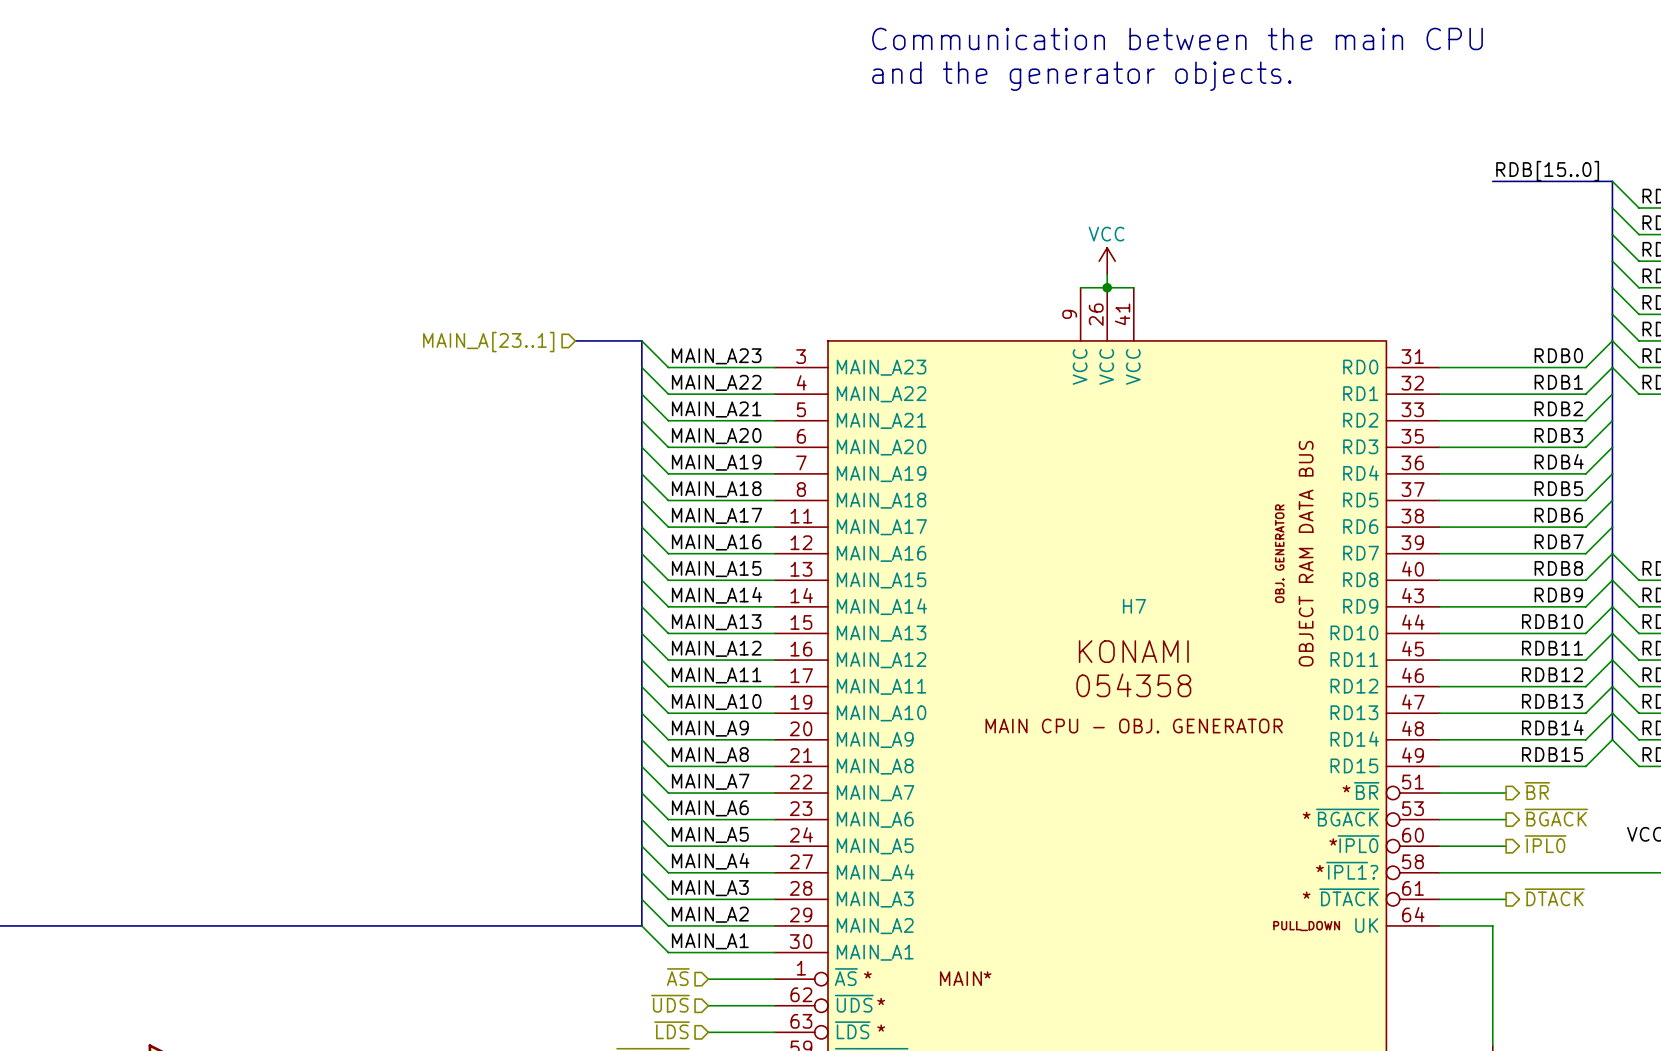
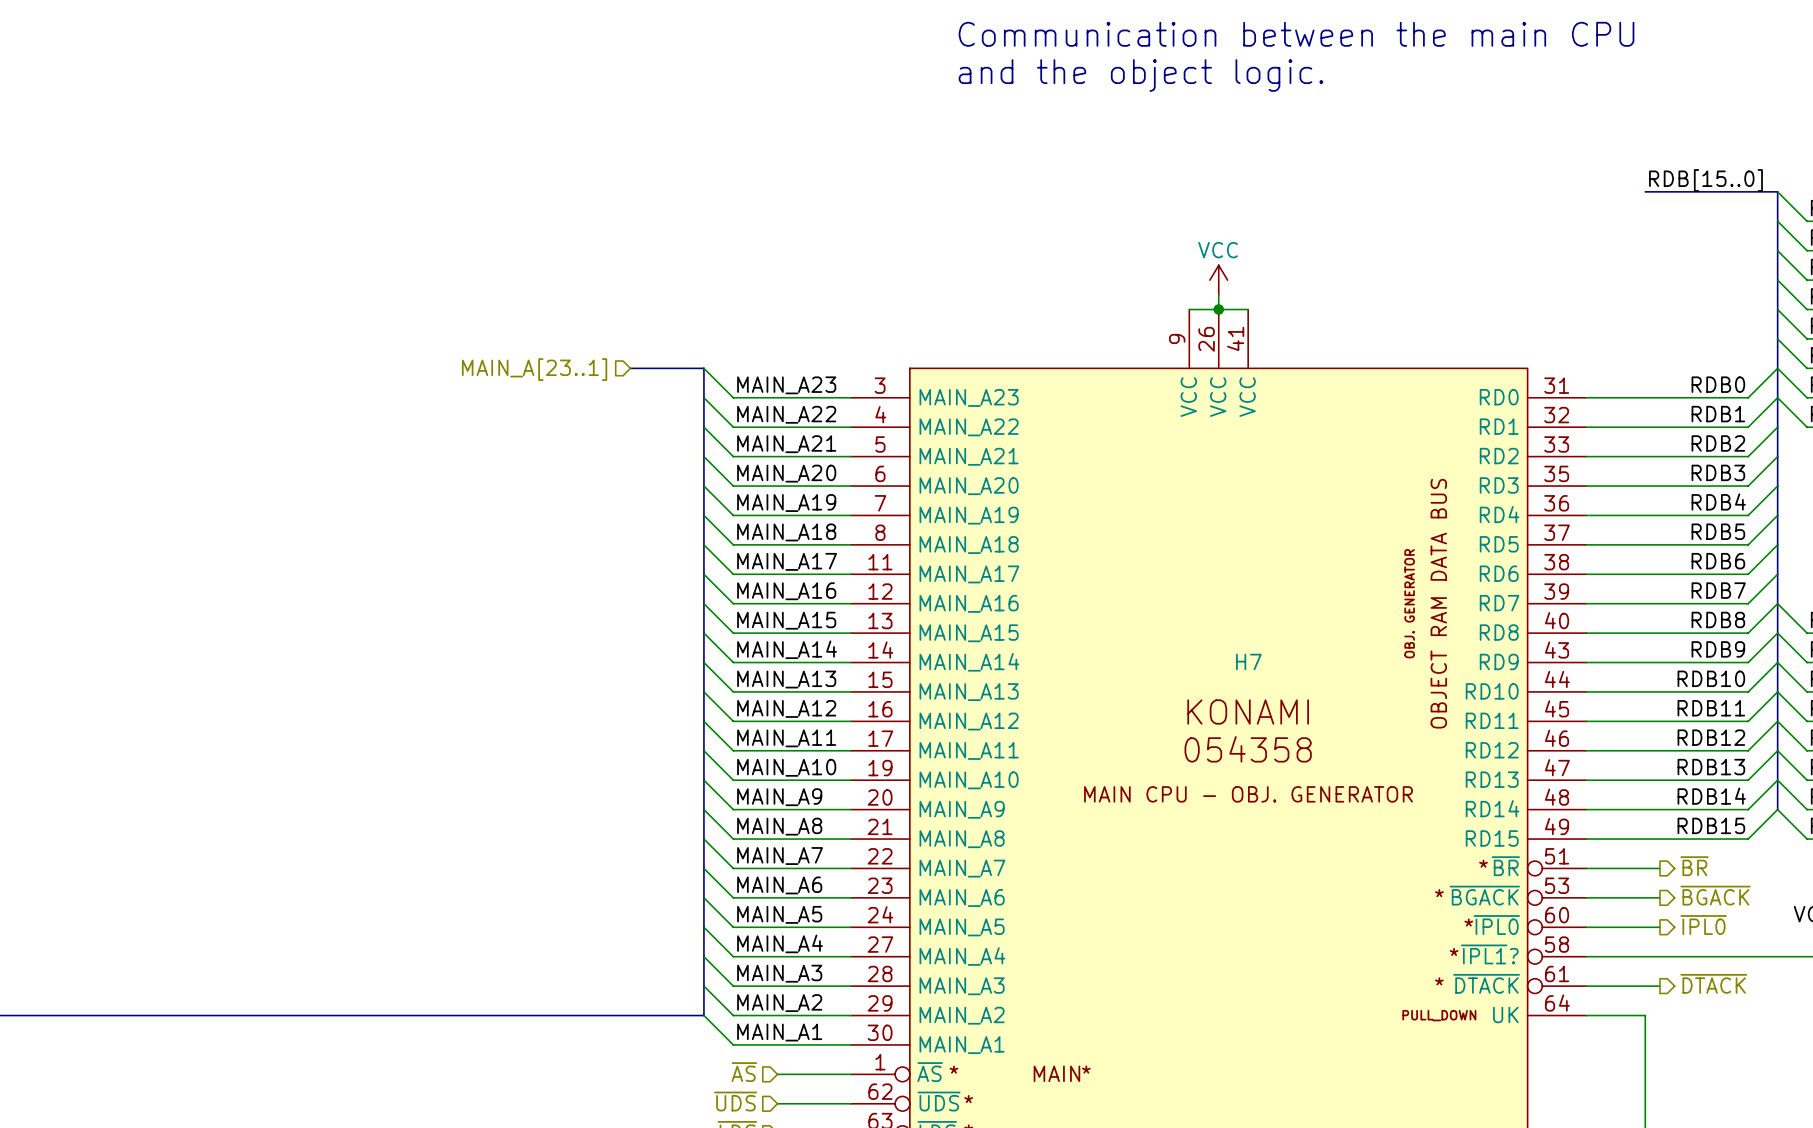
text: and the generator objects. (1081, 76) -> and the object logic. (1141, 75)

